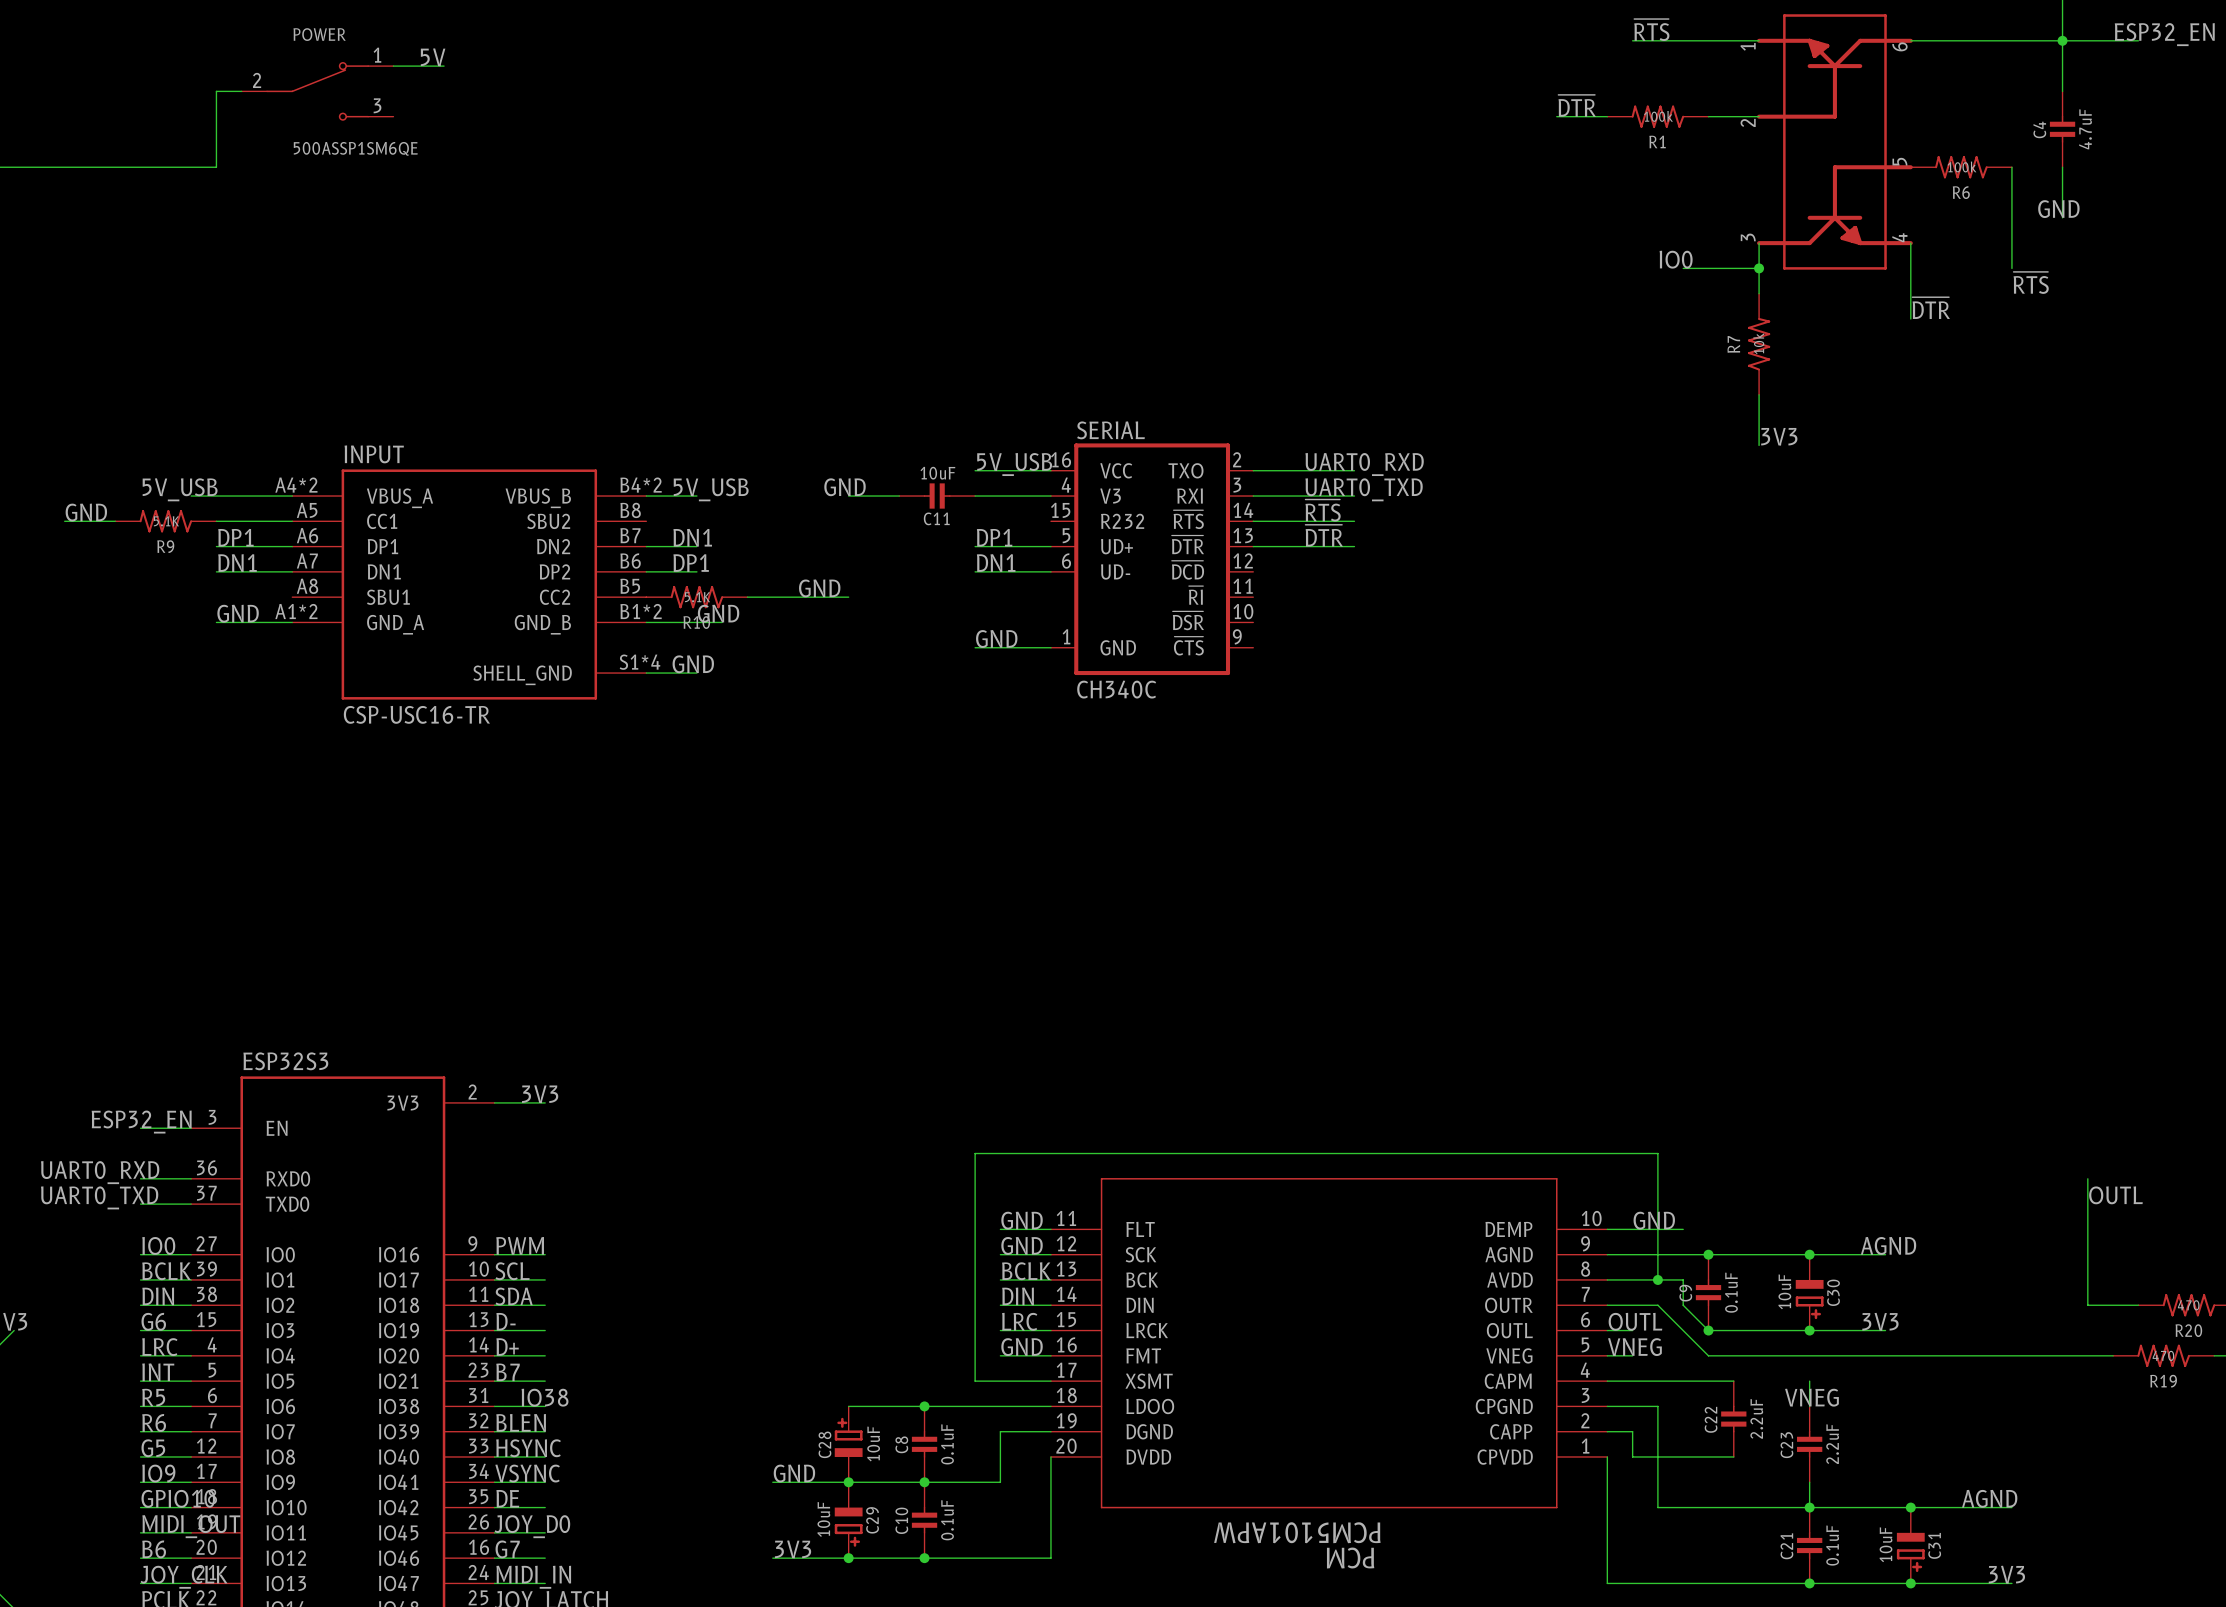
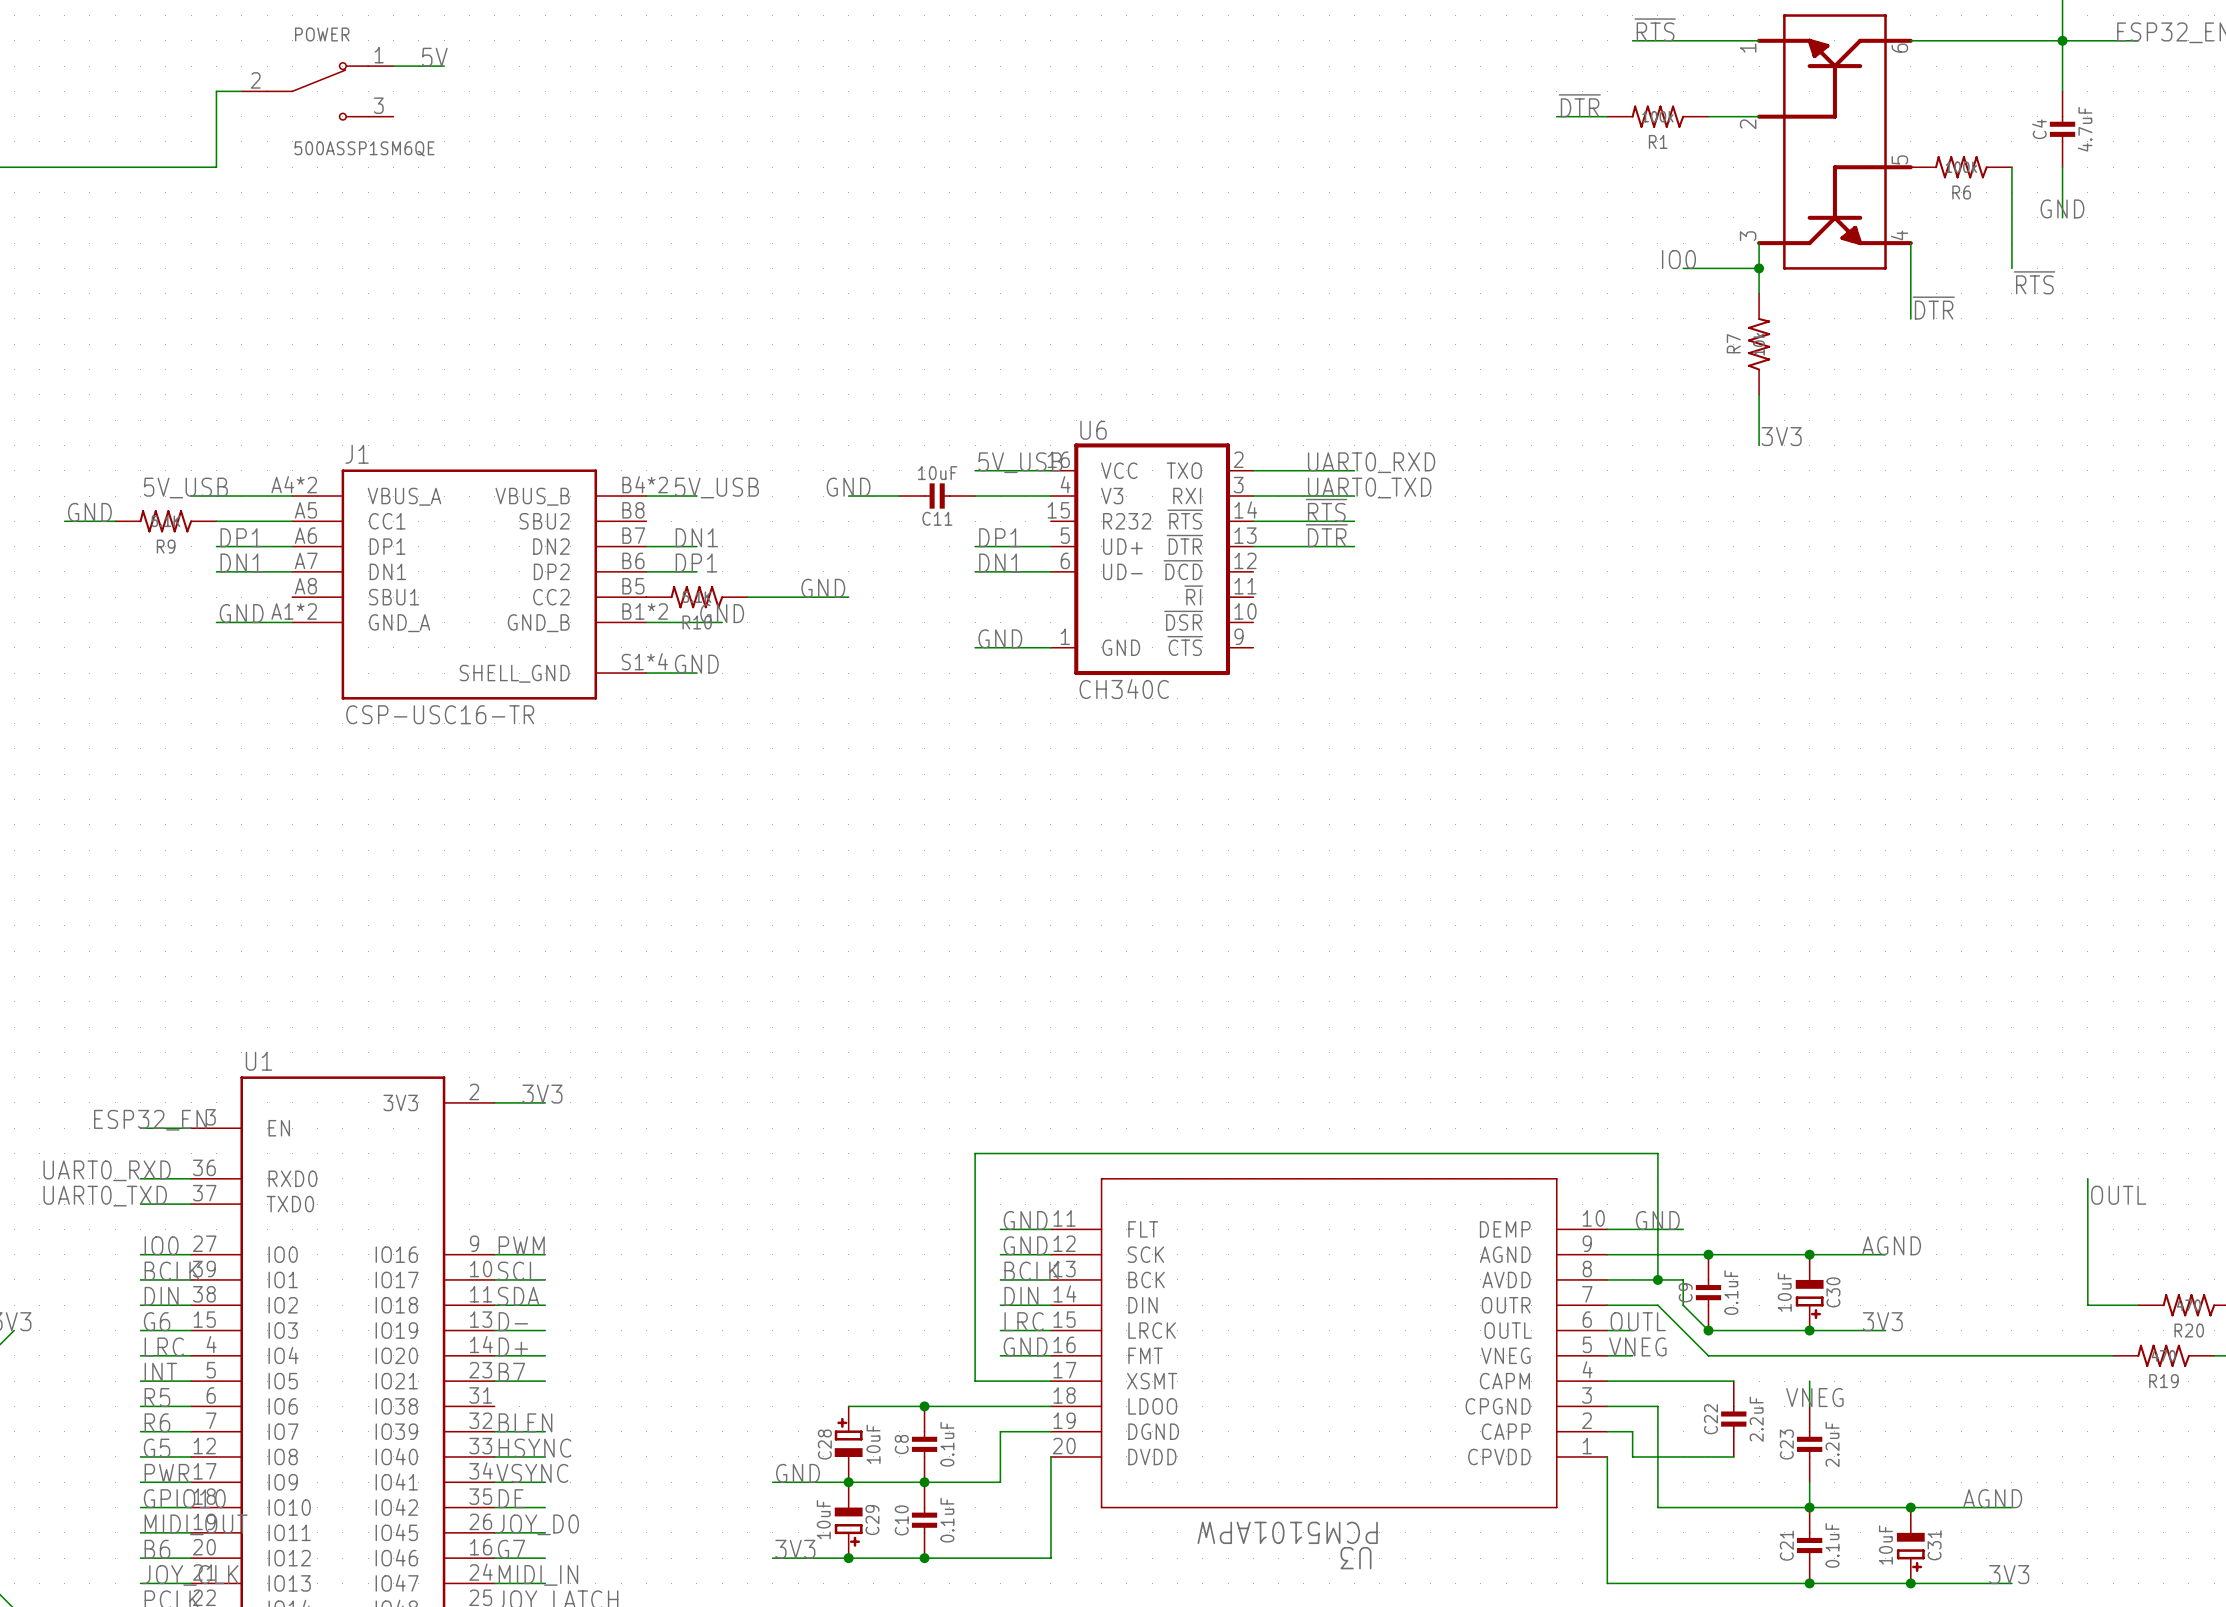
SERIAL name: SERIAL (1110, 430) -> U6 (1093, 430)
INPUT name: INPUT (374, 454) -> J1 (357, 454)
ESP32S3 name: ESP32S3 (285, 1061) -> U1 (258, 1061)
label: IO38 (545, 1397) -> none
wire: (494, 1406) (545, 1406) -> none
label: IO9 (158, 1473) -> PWR (166, 1473)
PCM name: PCM (1350, 1558) -> U3 (1355, 1558)

